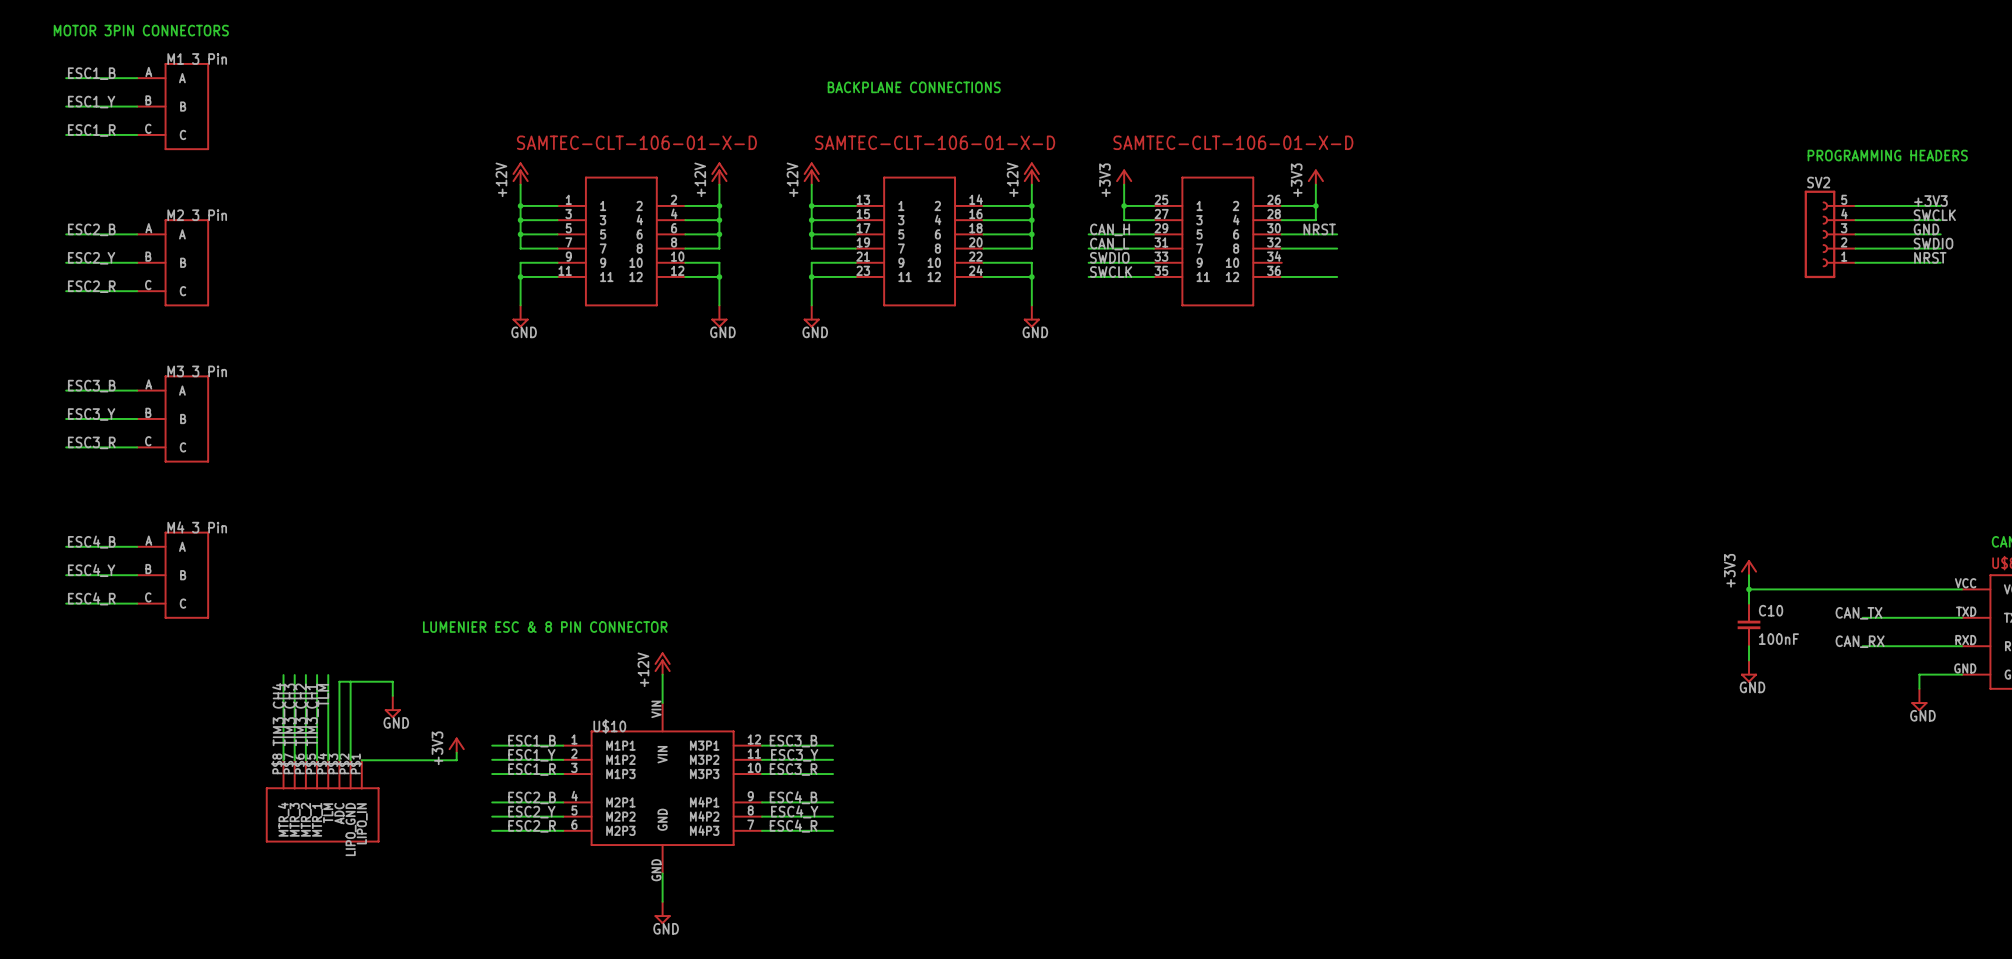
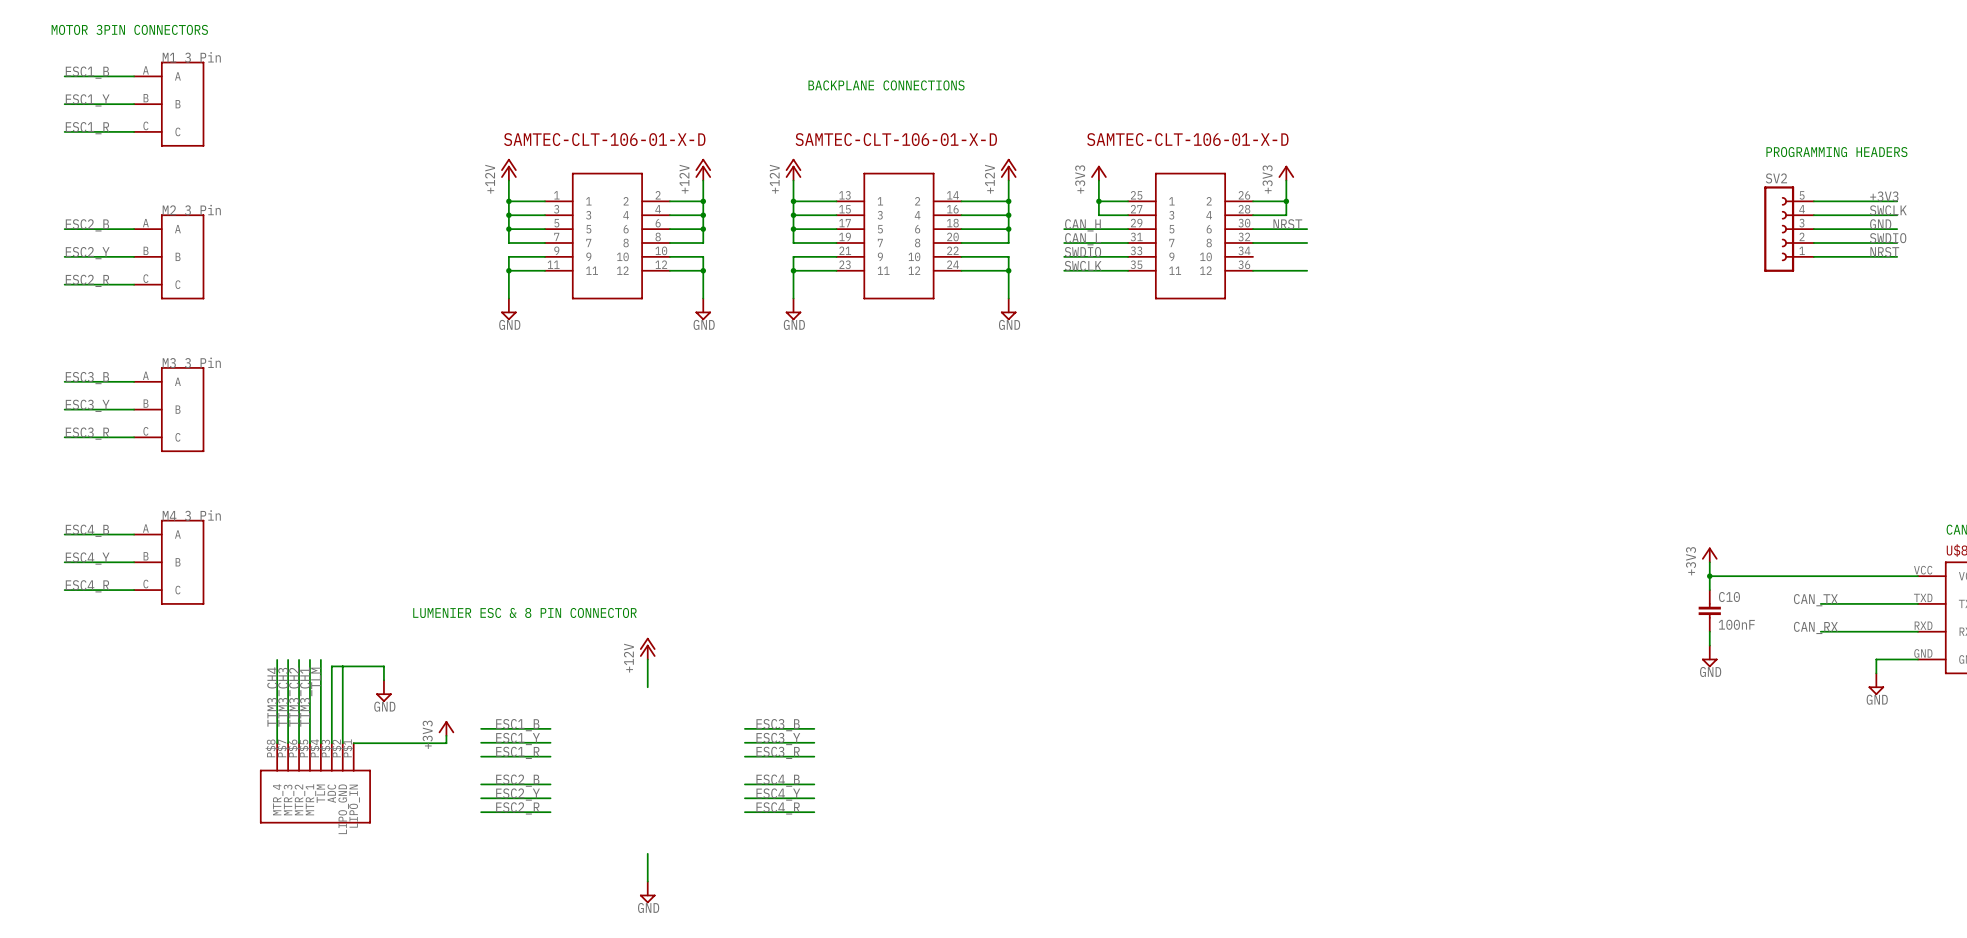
U$10: (662, 788) -> none

